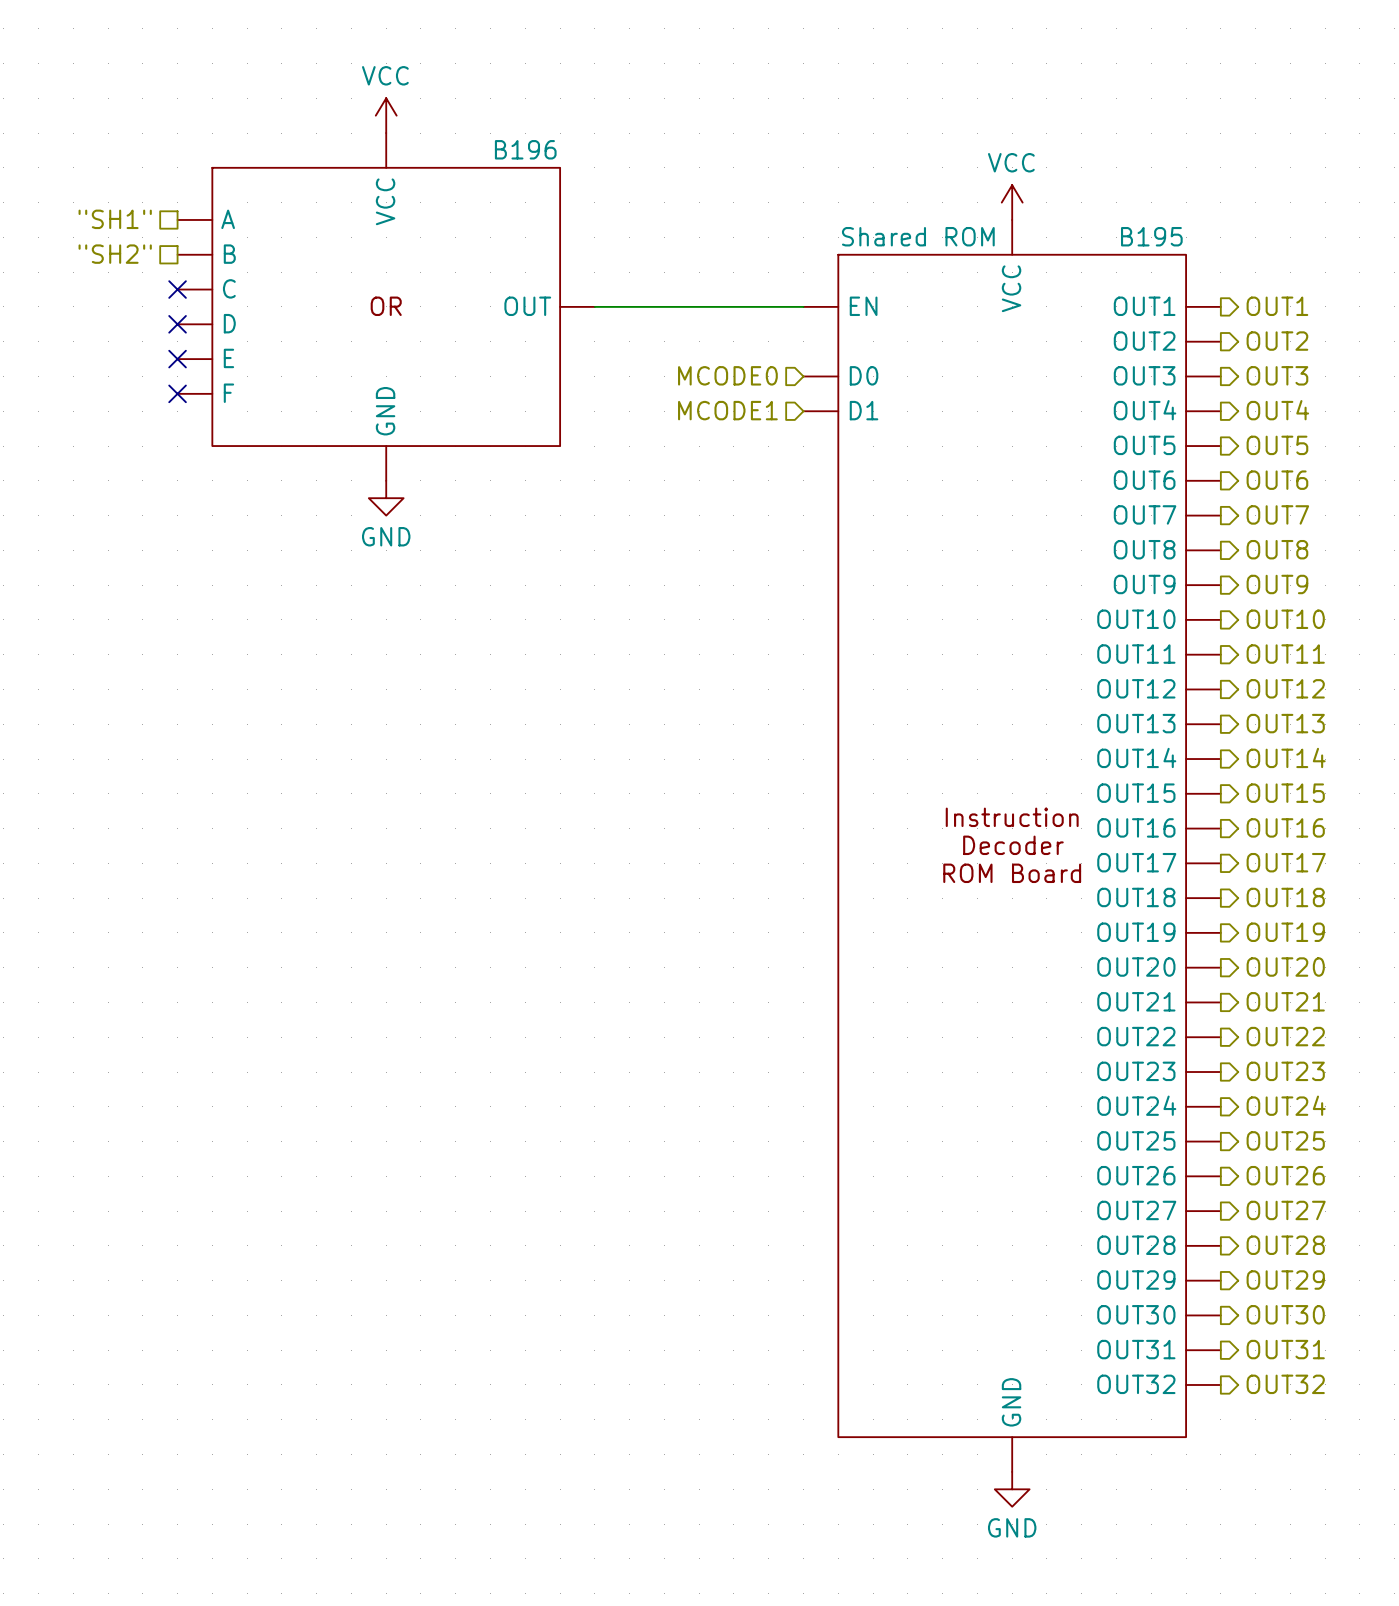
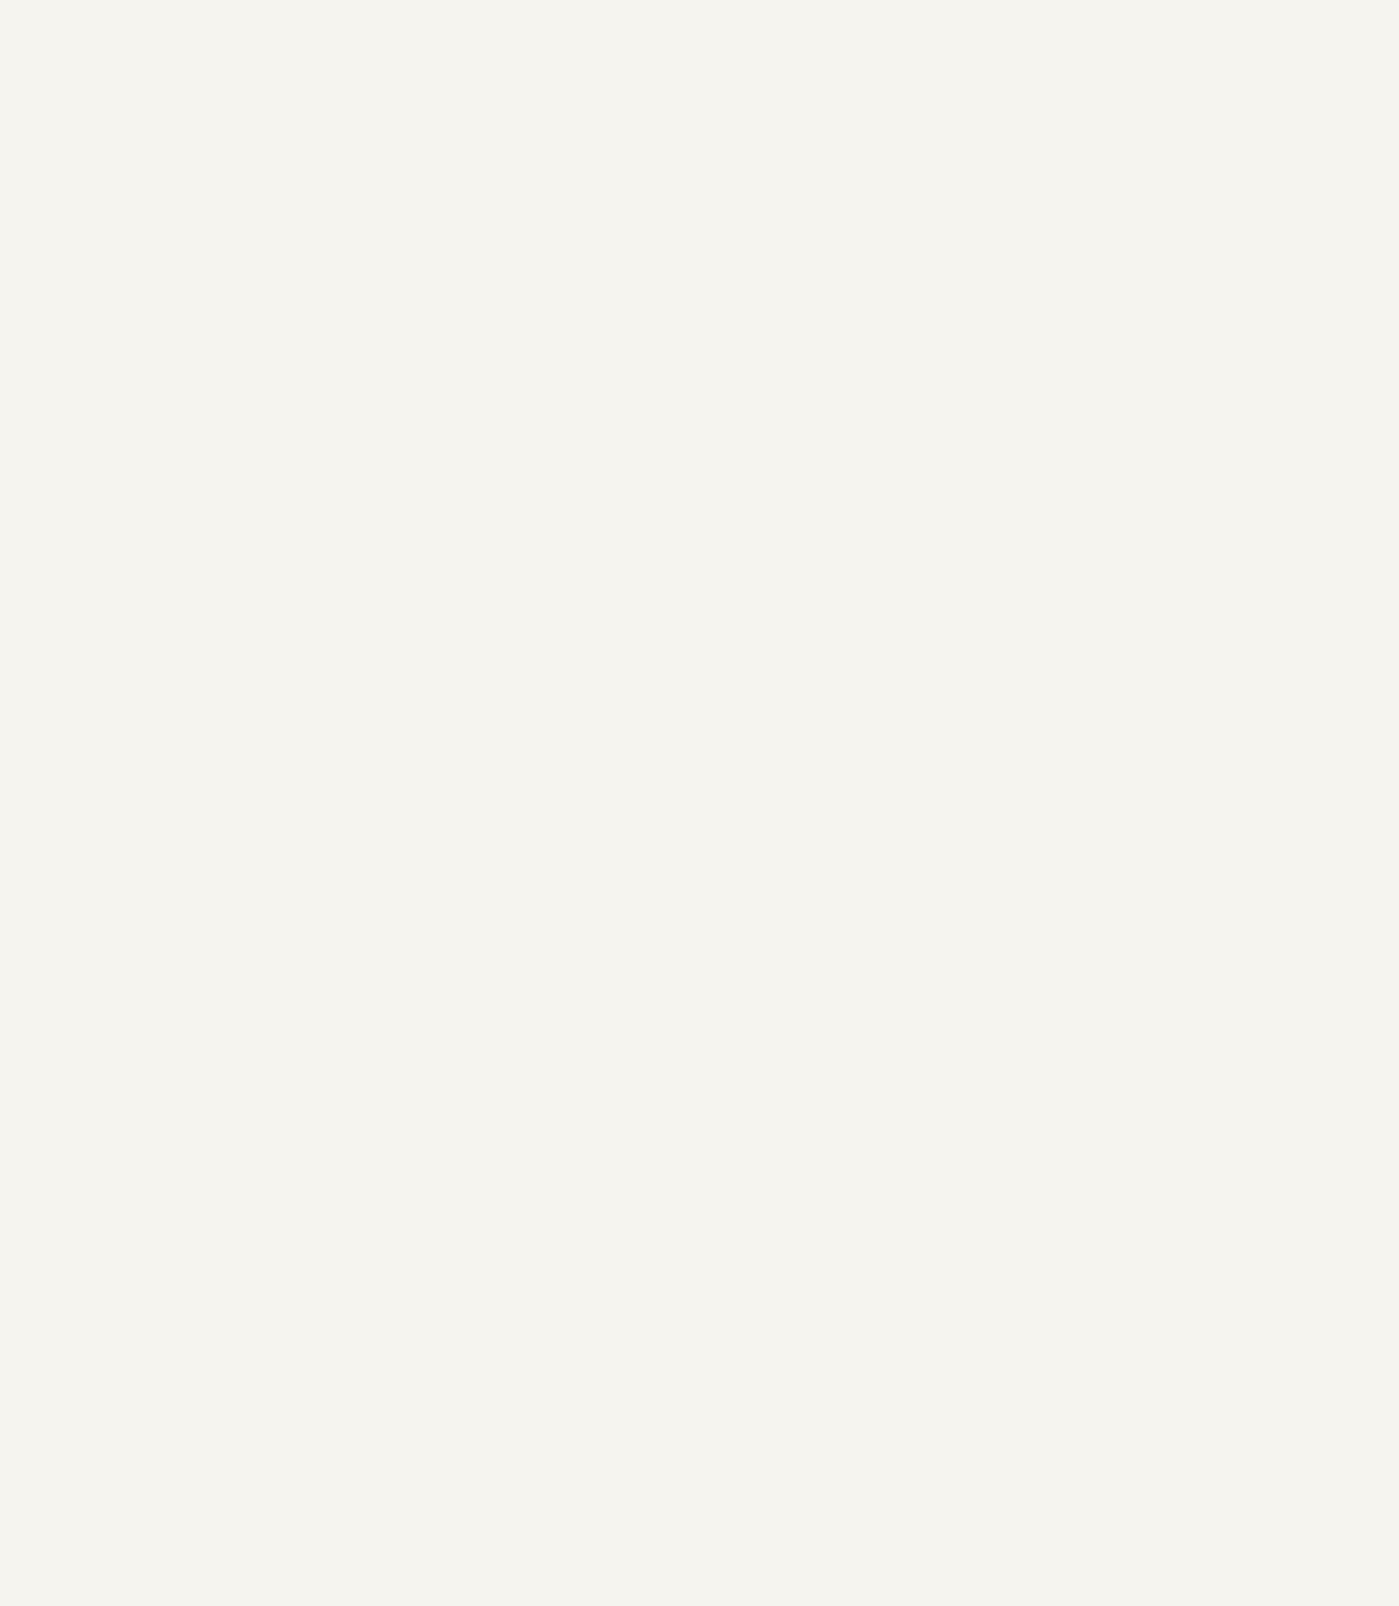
power symbol: VCC (386, 115) -> none
power symbol: VCC (1012, 202) -> none
hierarchical label: "SH1" (115, 219) -> none
hierarchical label: "SH2" (115, 254) -> none
no-connect mark: (177, 289) -> none
B196: (386, 306) -> none
wire: (594, 306) (803, 306) -> none
hierarchical label: OUT1 (1277, 306) -> none
no-connect mark: (177, 324) -> none
hierarchical label: OUT2 (1277, 341) -> none
no-connect mark: (177, 359) -> none
hierarchical label: MCODE0 (727, 375) -> none
hierarchical label: OUT3 (1277, 375) -> none
no-connect mark: (177, 393) -> none
hierarchical label: MCODE1 (727, 410) -> none
hierarchical label: OUT4 (1277, 410) -> none
hierarchical label: OUT5 (1277, 445) -> none
hierarchical label: OUT6 (1277, 480) -> none
power symbol: GND (386, 498) -> none
hierarchical label: OUT7 (1277, 514) -> none
hierarchical label: OUT8 (1277, 549) -> none
hierarchical label: OUT9 (1277, 584) -> none
hierarchical label: OUT10 (1285, 619) -> none
hierarchical label: OUT11 (1285, 654) -> none
hierarchical label: OUT12 (1285, 688) -> none
hierarchical label: OUT13 (1285, 723) -> none
hierarchical label: OUT14 (1286, 757) -> none
hierarchical label: OUT15 (1285, 793) -> none
hierarchical label: OUT16 (1285, 827) -> none
B195: Shared ROM (1012, 845) -> none
hierarchical label: OUT17 (1286, 862) -> none
hierarchical label: OUT18 (1285, 897) -> none
hierarchical label: OUT19 (1285, 932) -> none
hierarchical label: OUT20 (1285, 967) -> none
hierarchical label: OUT21 (1285, 1001) -> none
hierarchical label: OUT22 (1285, 1036) -> none
hierarchical label: OUT23 (1285, 1071) -> none
hierarchical label: OUT24 (1286, 1105) -> none
hierarchical label: OUT25 (1285, 1140) -> none
hierarchical label: OUT26 (1285, 1175) -> none
hierarchical label: OUT27 (1286, 1210) -> none
hierarchical label: OUT28 (1285, 1245) -> none
hierarchical label: OUT29 (1285, 1280) -> none
hierarchical label: OUT30 (1285, 1314) -> none
hierarchical label: OUT31 (1285, 1349) -> none
hierarchical label: OUT32 (1285, 1384) -> none
power symbol: GND (1012, 1489) -> none

